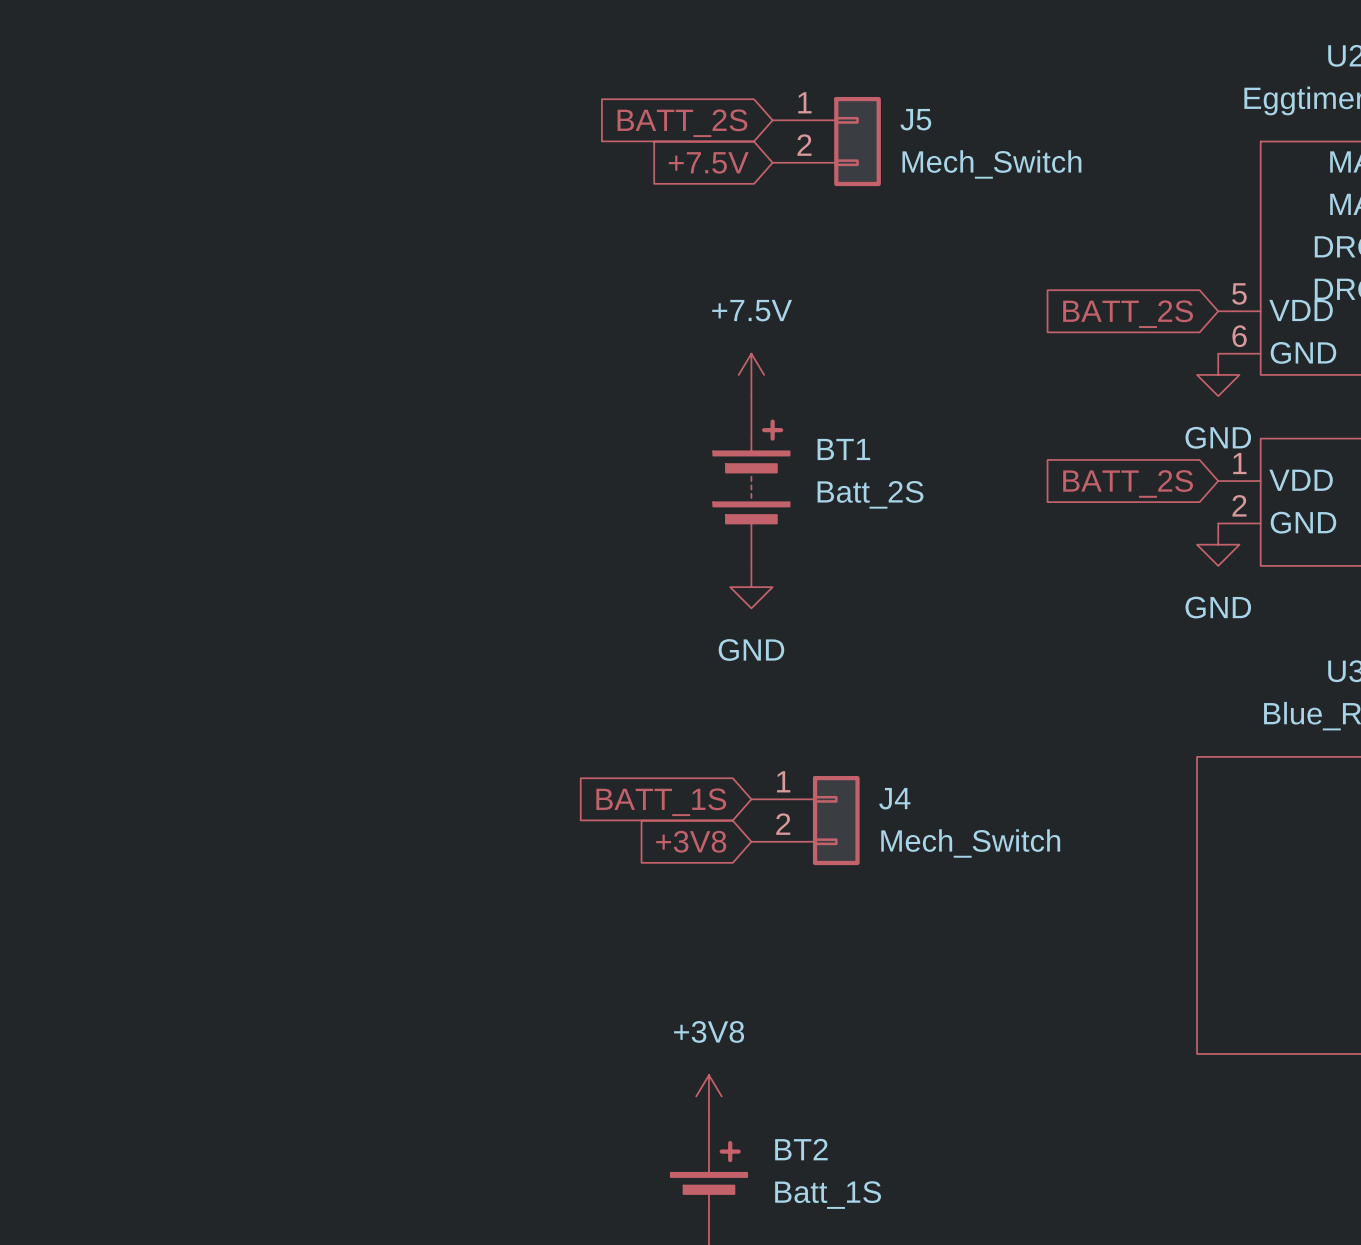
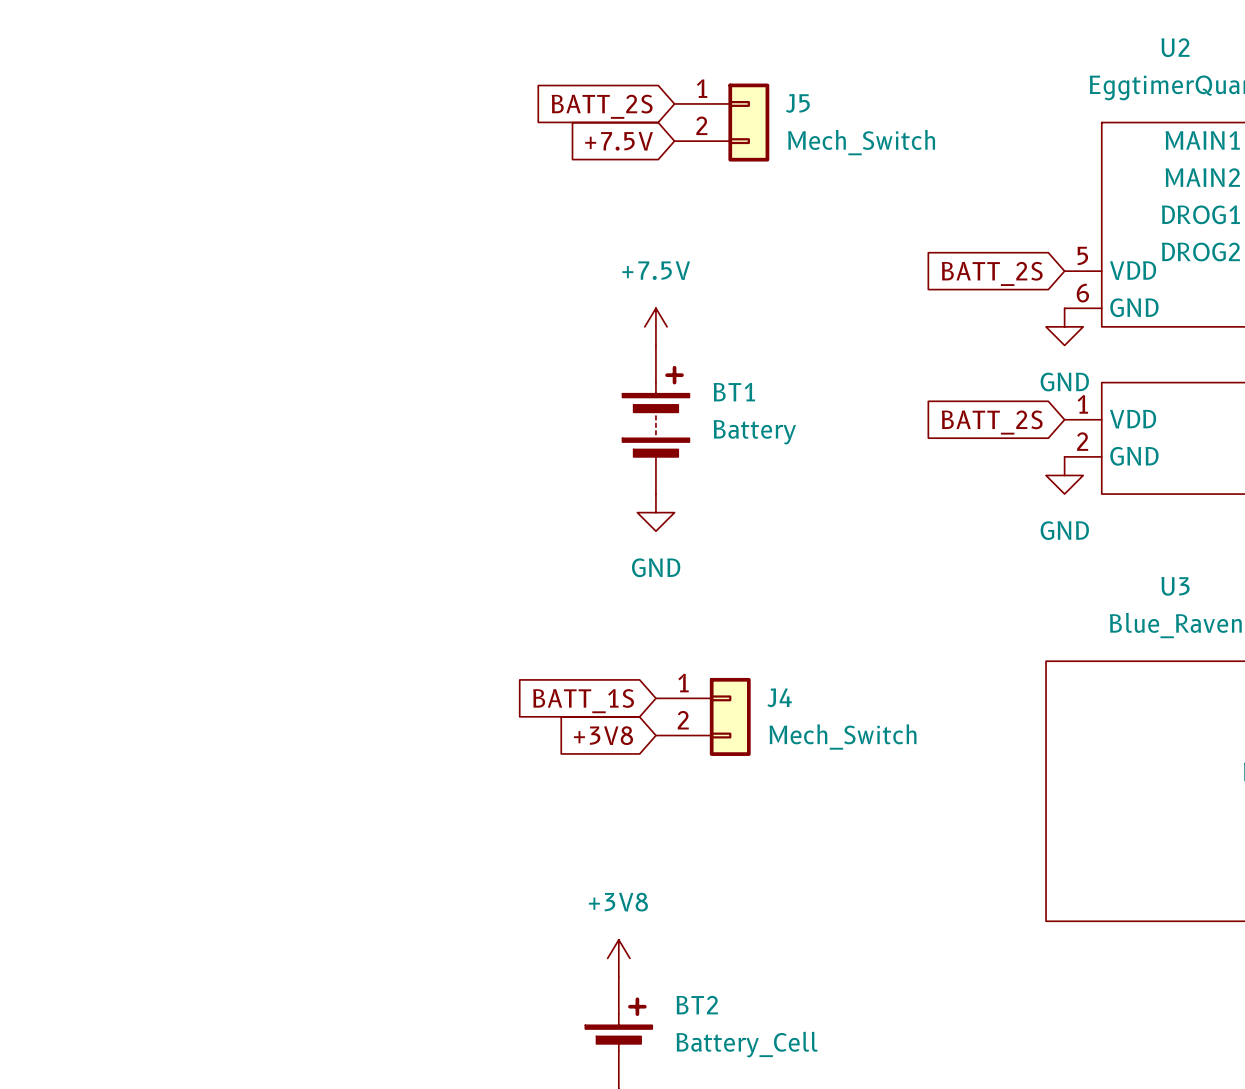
BT1 value: Batt_2S (870, 494) -> Battery (754, 432)
BT2 value: Batt_1S (828, 1195) -> Battery_Cell (747, 1044)

